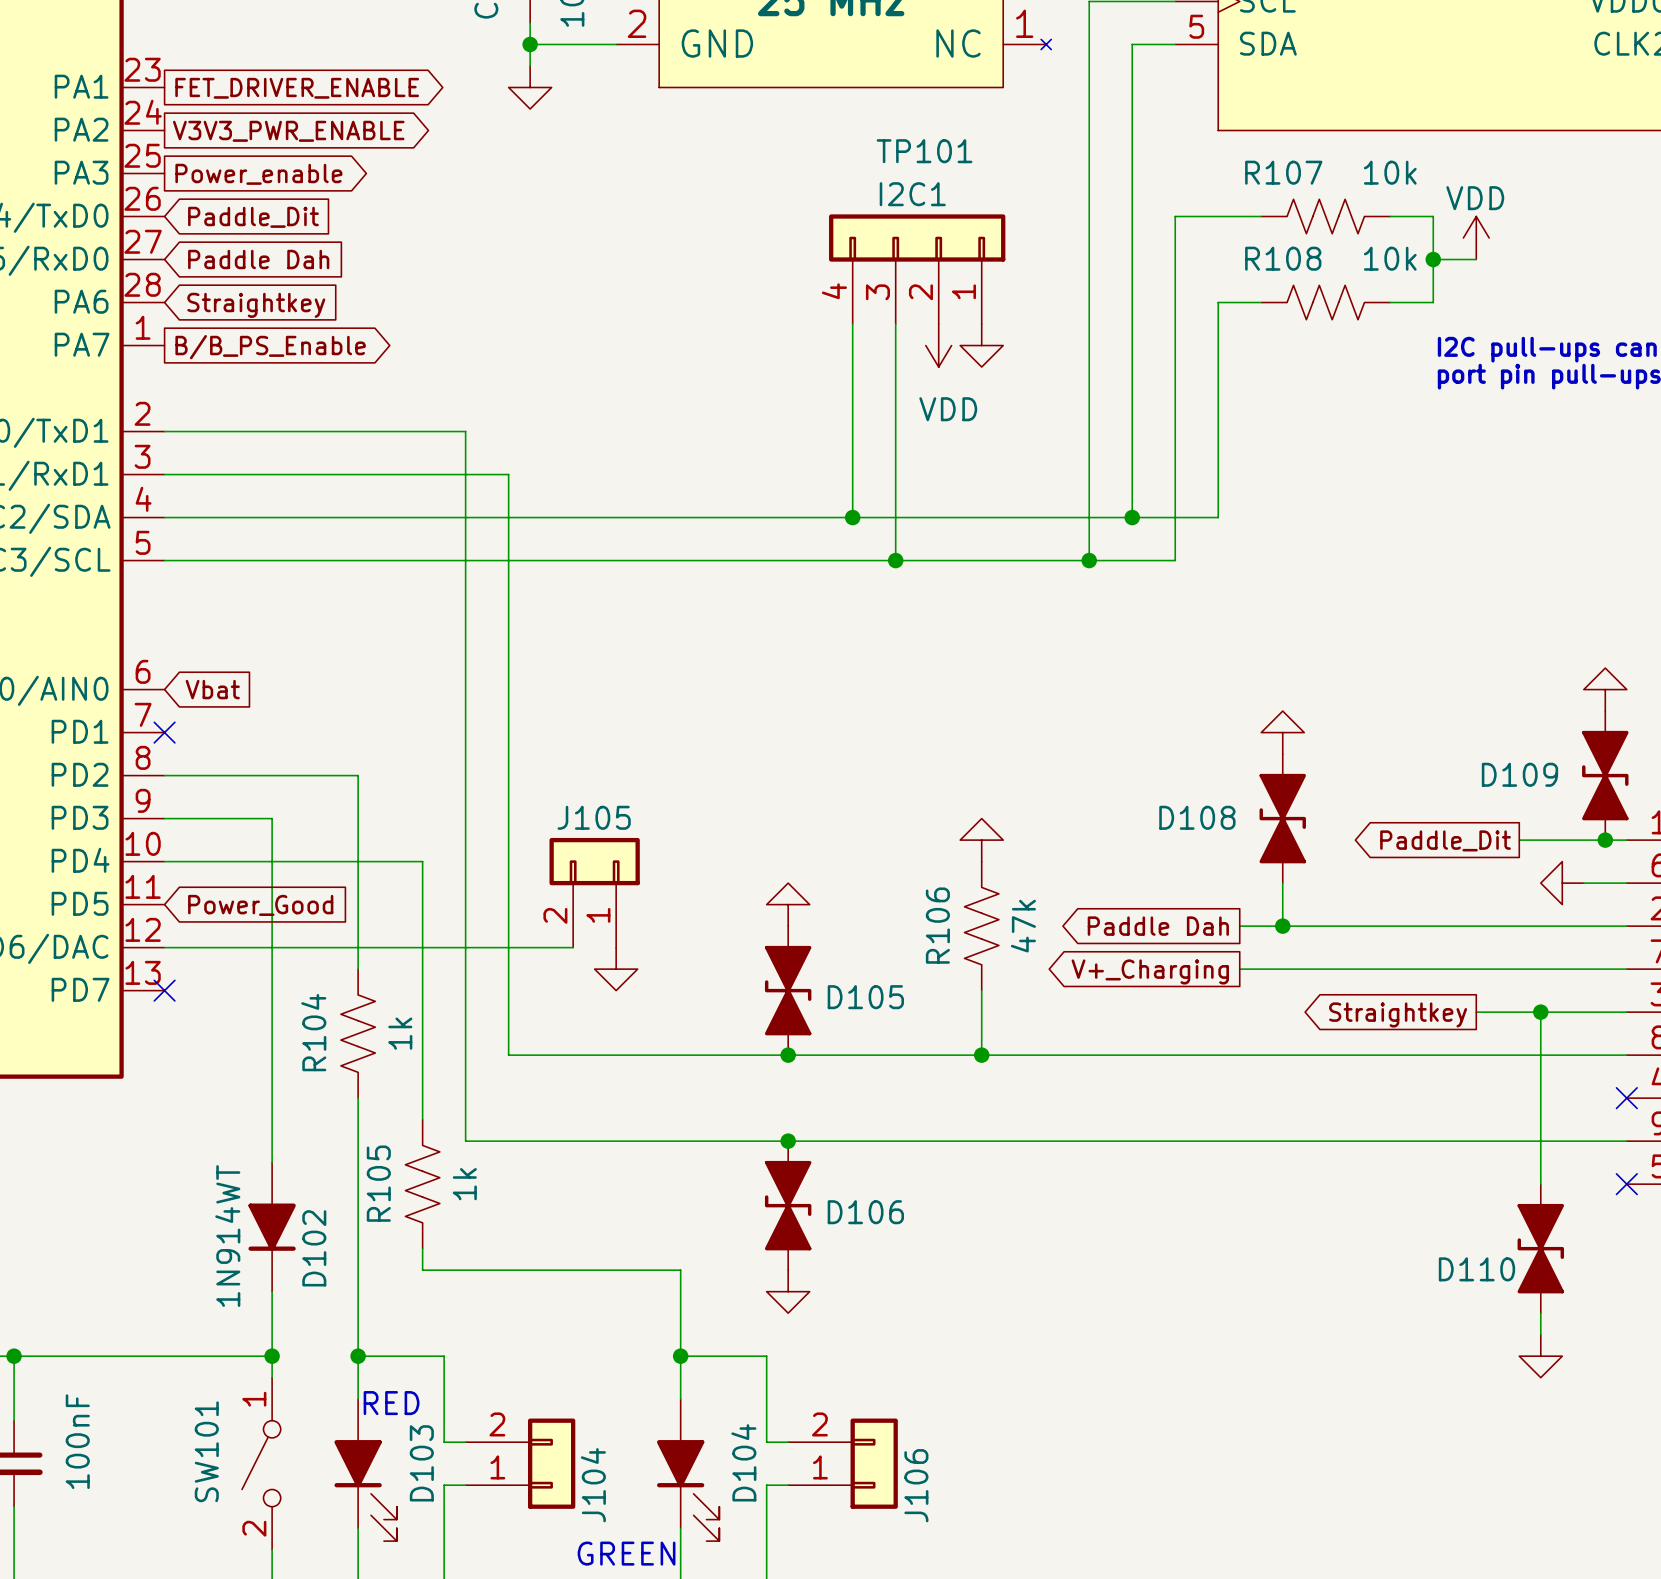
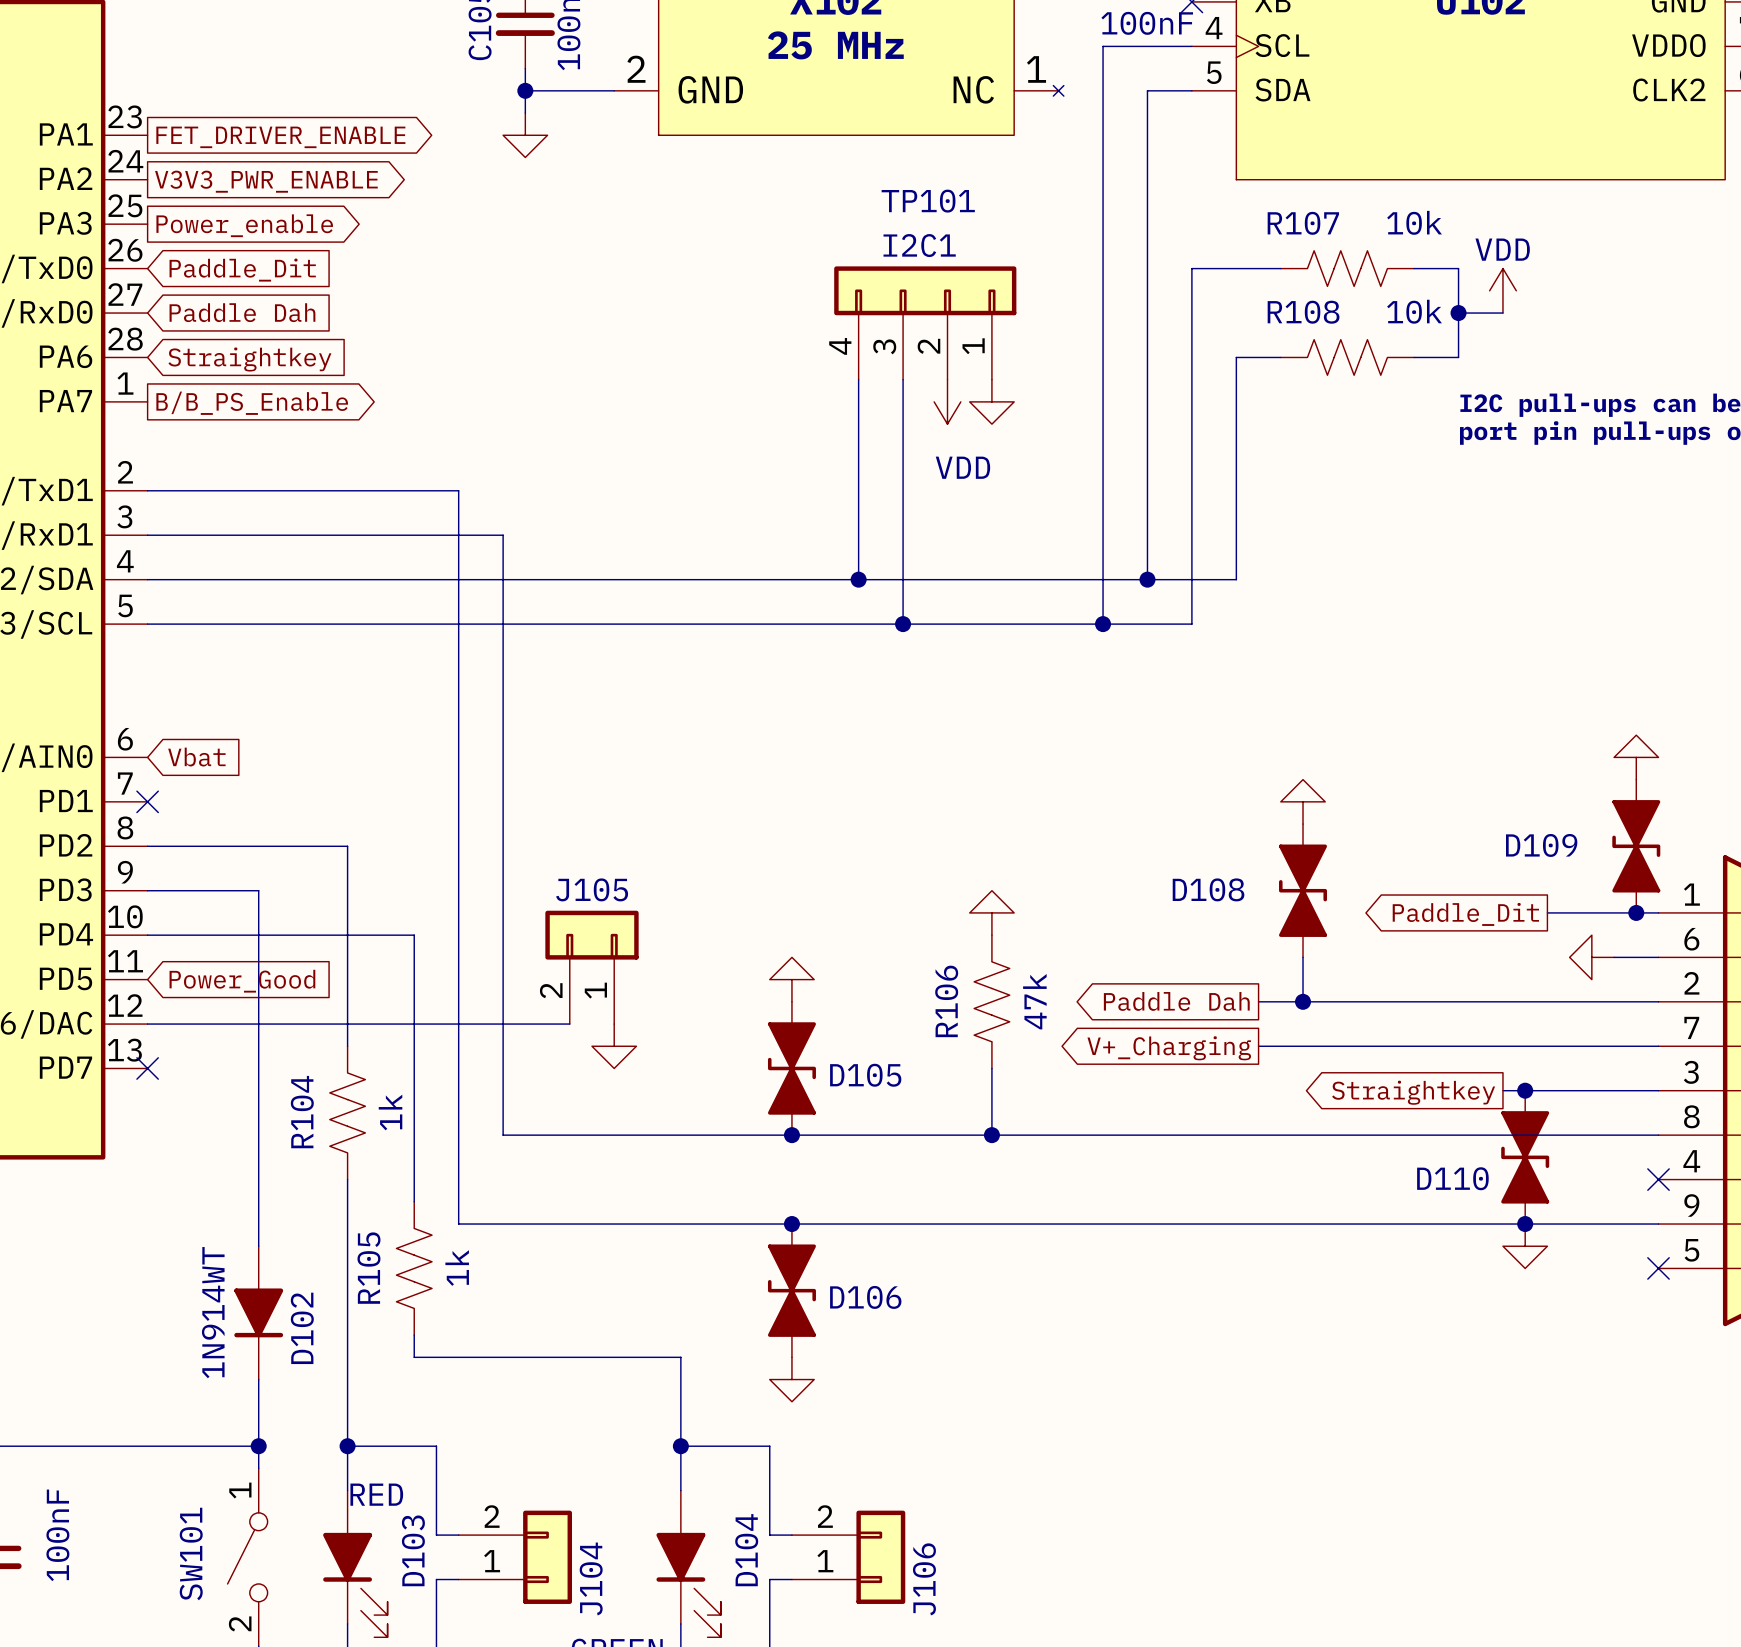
wire: (1540, 1012) (1540, 1184) -> none
junction position: (1540, 1012) -> (1525, 1090)
junction: none -> (1525, 1224)
D110 position: (1540, 1248) -> (1525, 1157)
wire: (1540, 1313) (1540, 1334) -> none
power symbol position: (1540, 1356) -> (1525, 1246)

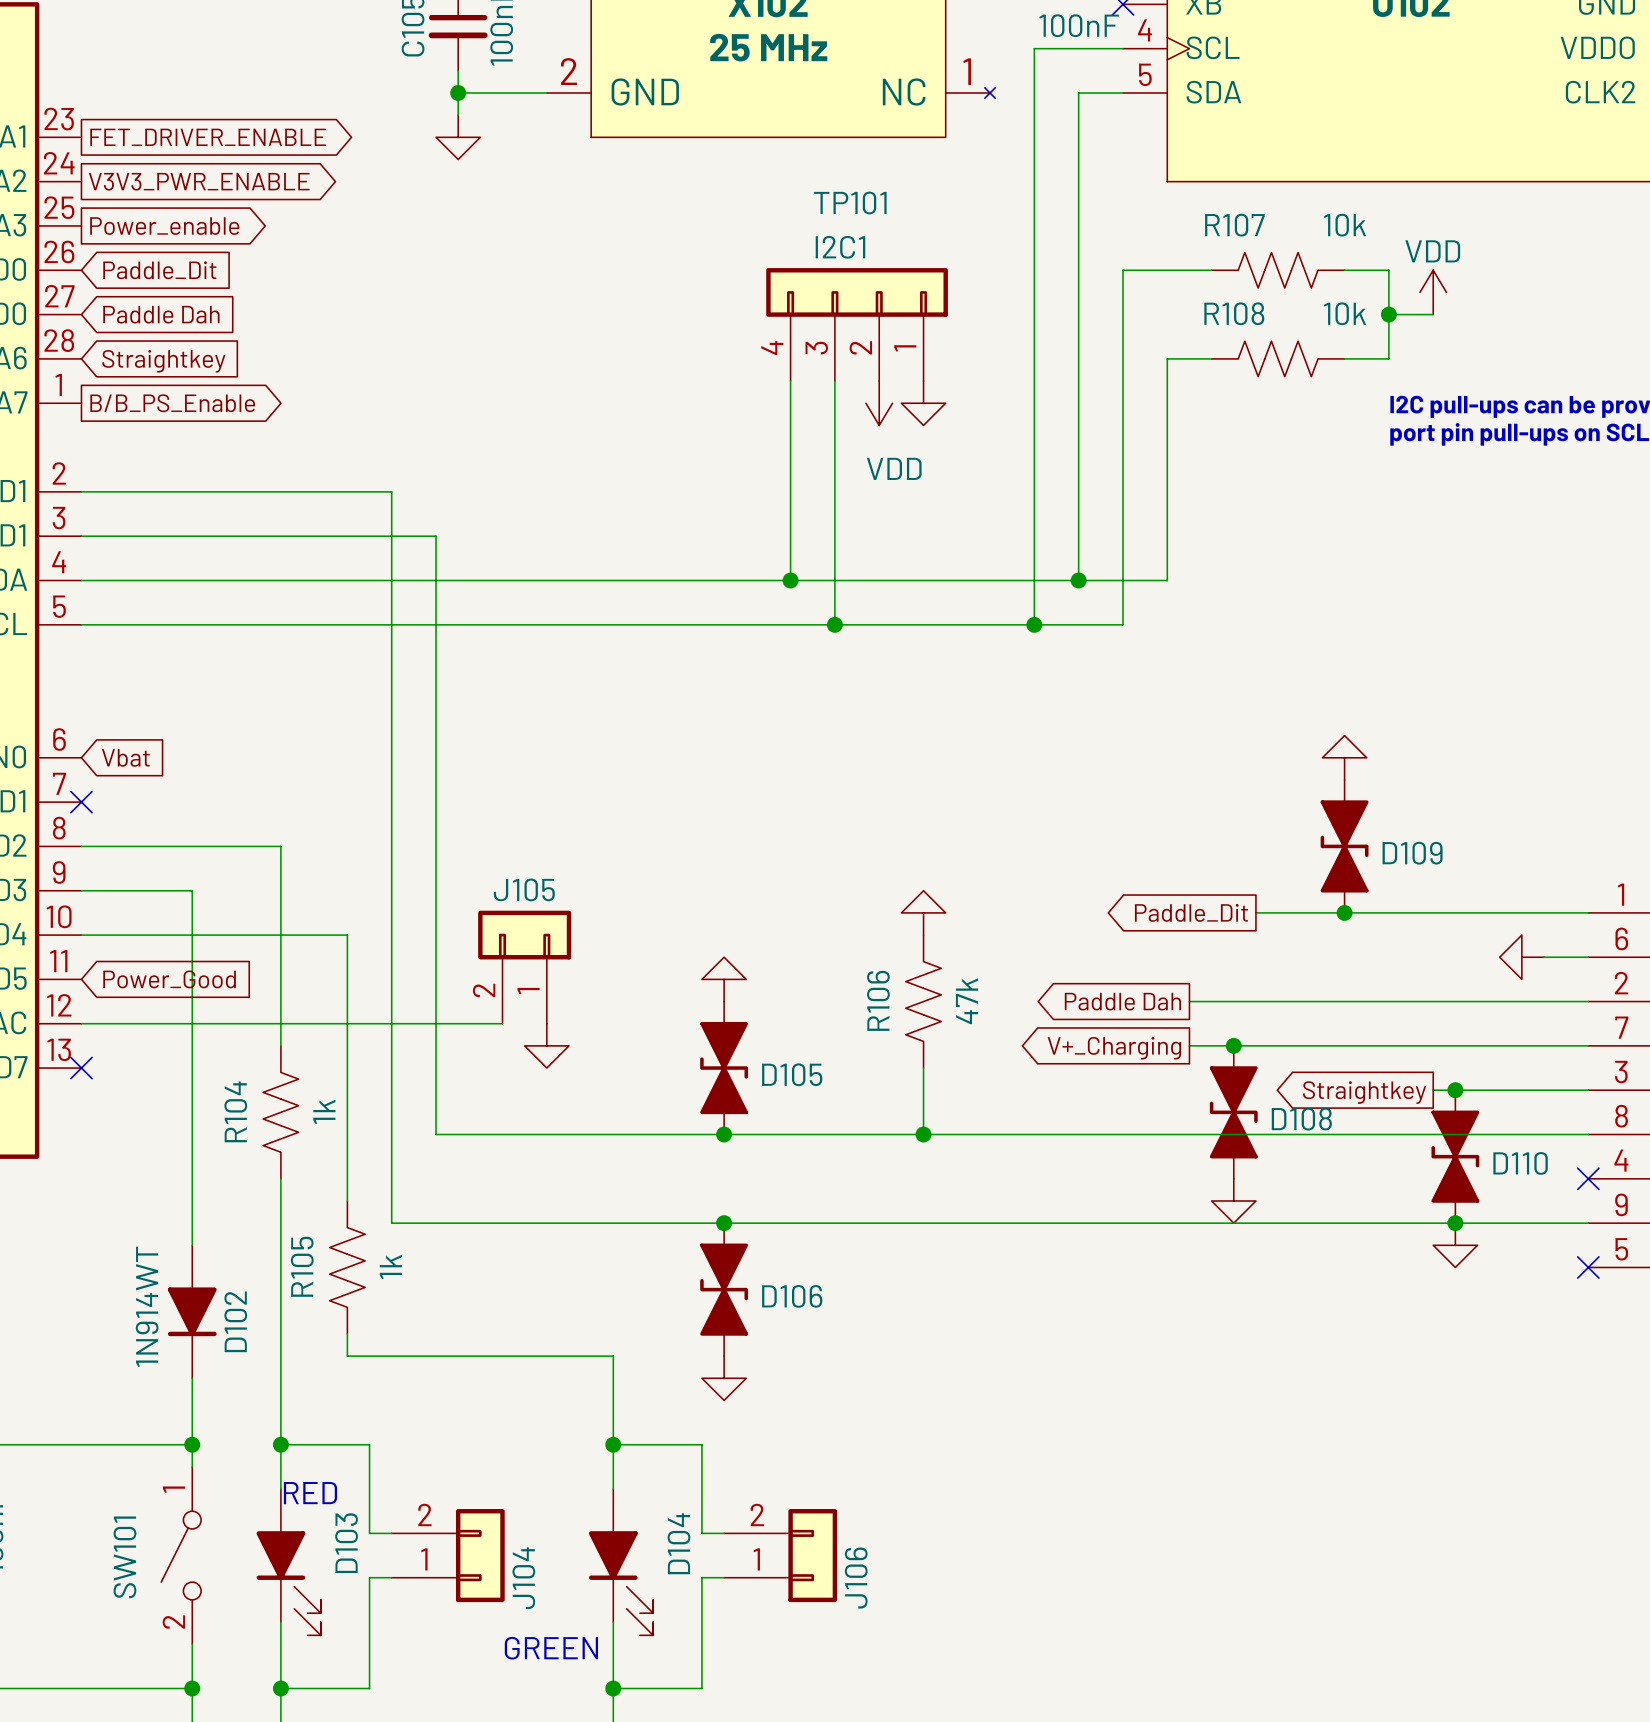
power symbol: none -> (1344, 757)
power symbol: (1636, 757) -> none
power symbol: (1303, 801) -> none
D109 name position: D109 (1541, 845) -> D109 (1412, 853)
D109 position: (1636, 846) -> (1344, 846)
D108 name position: D108 (1208, 889) -> D108 (1301, 1119)
D108 position: (1303, 890) -> (1233, 1112)
wire: none -> (1255, 912) (1477, 912)
junction: none -> (1344, 912)
junction: (1636, 912) -> none
global label position: Paddle_Dit (1465, 914) -> Paddle_Dit (1191, 912)
wire: (1303, 957) (1303, 1001) -> none
junction position: (1303, 1001) -> (1233, 1045)
D110 name position: D110 (1452, 1178) -> D110 (1520, 1163)
power symbol: none -> (1233, 1200)

